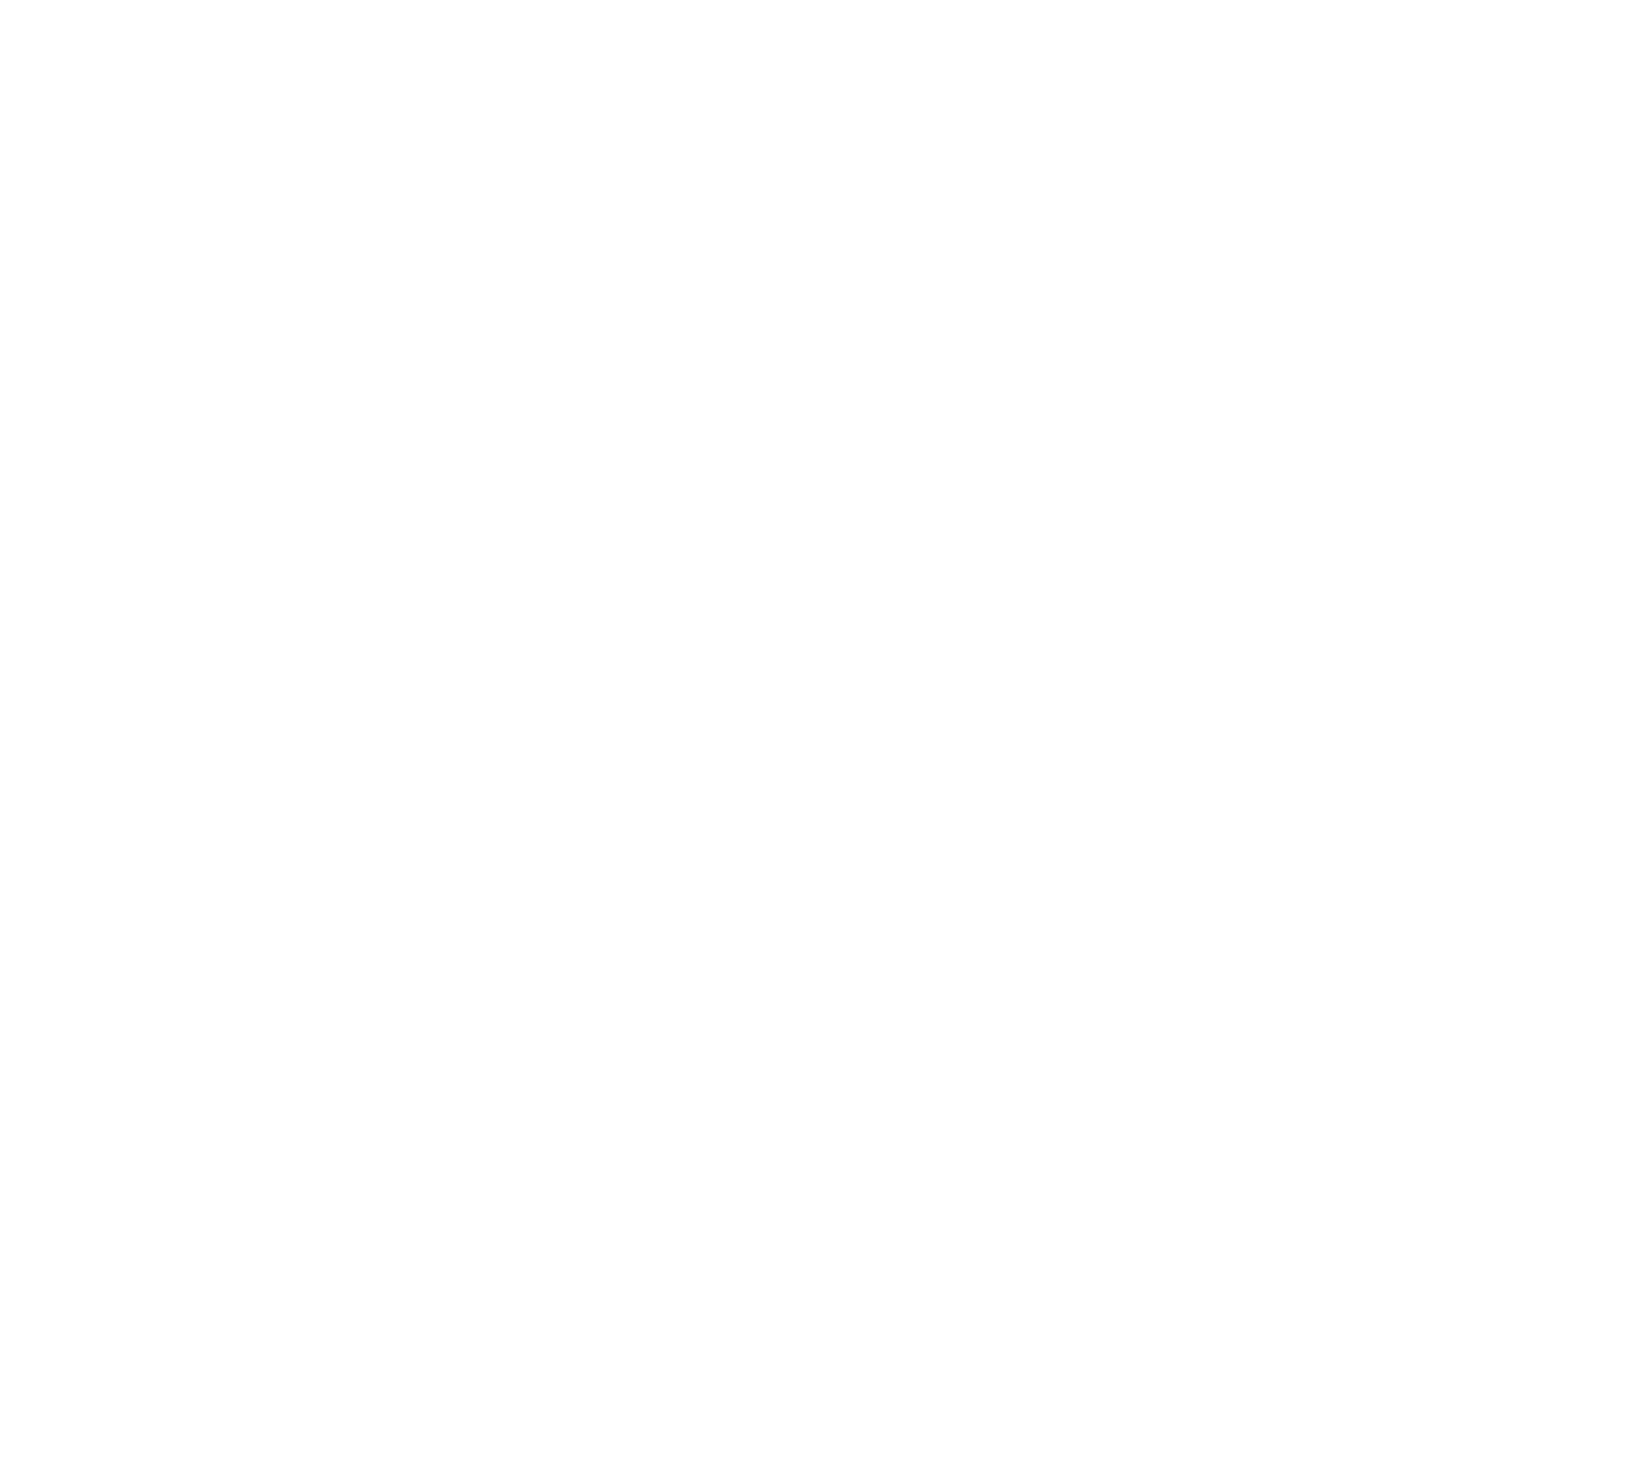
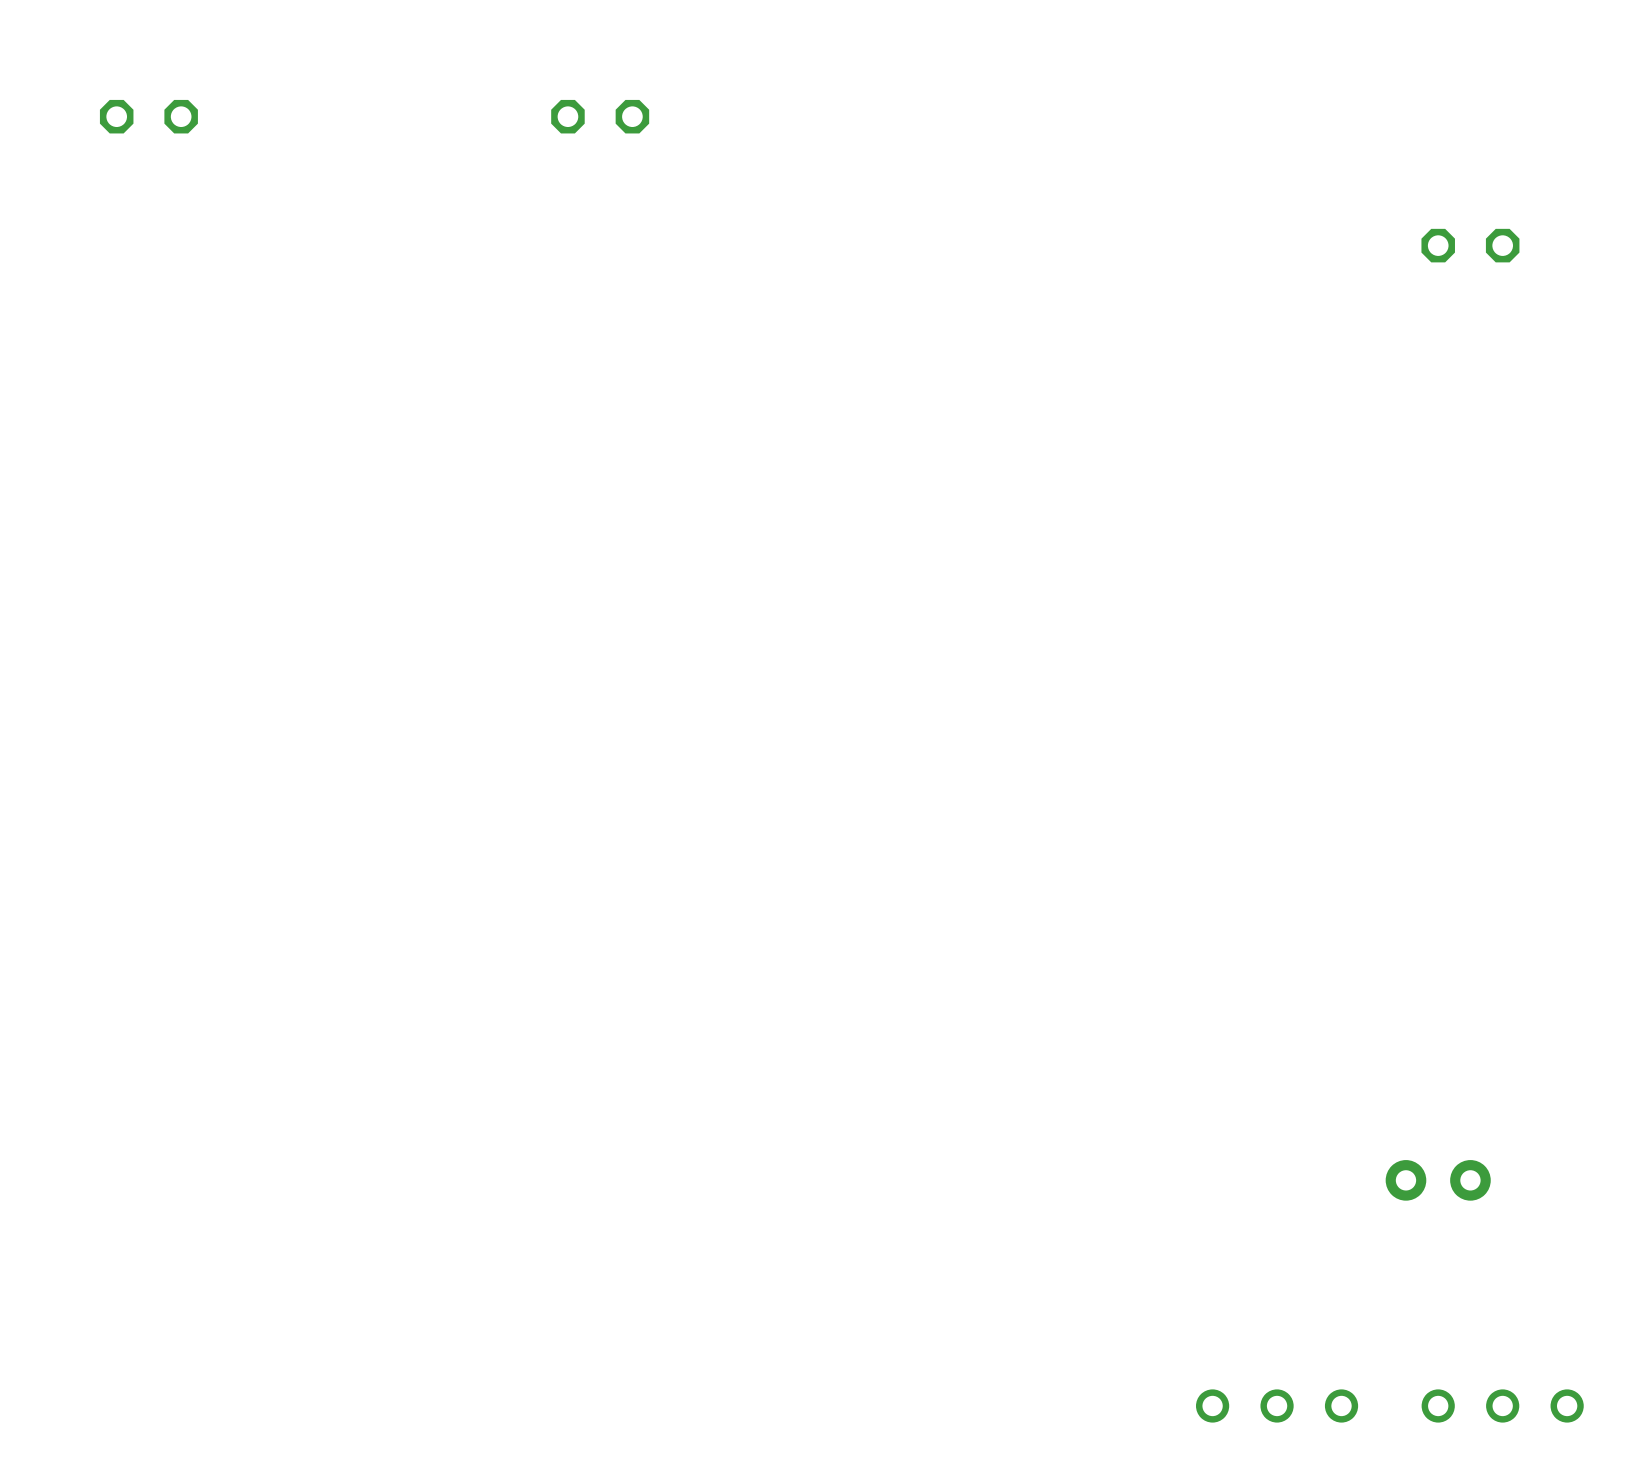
part: none -> (148, 116)
part: none -> (600, 116)
part: none -> (1470, 245)
part: none -> (1438, 1180)
part: none -> (1277, 1405)
part: none -> (1502, 1405)

